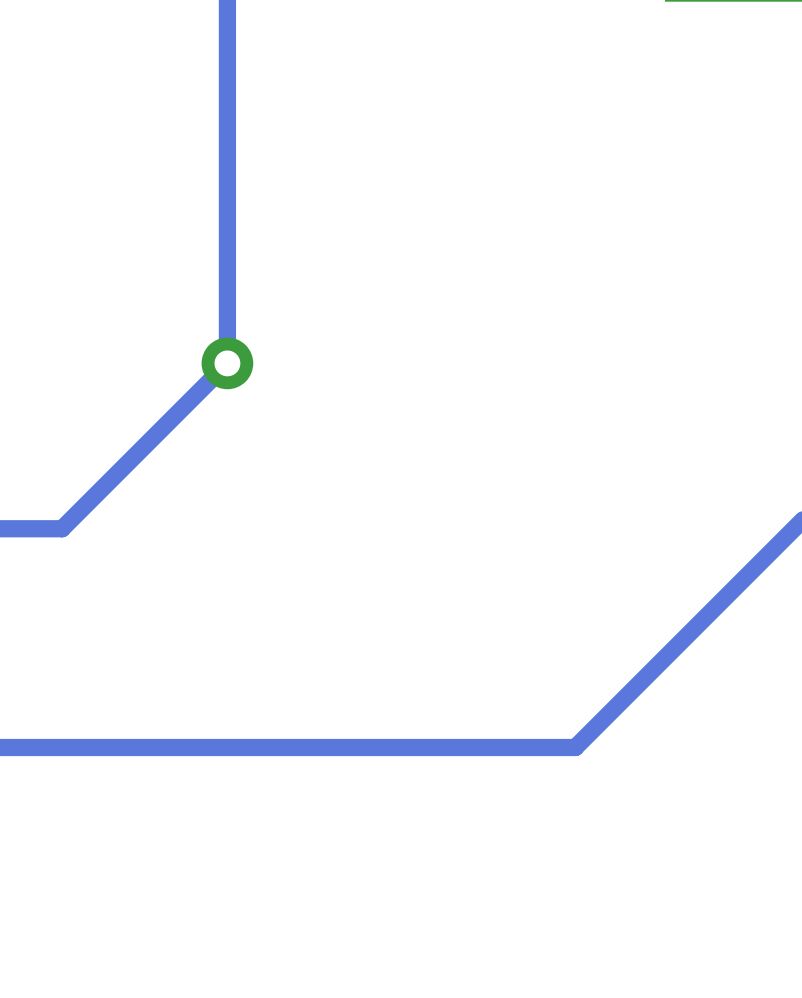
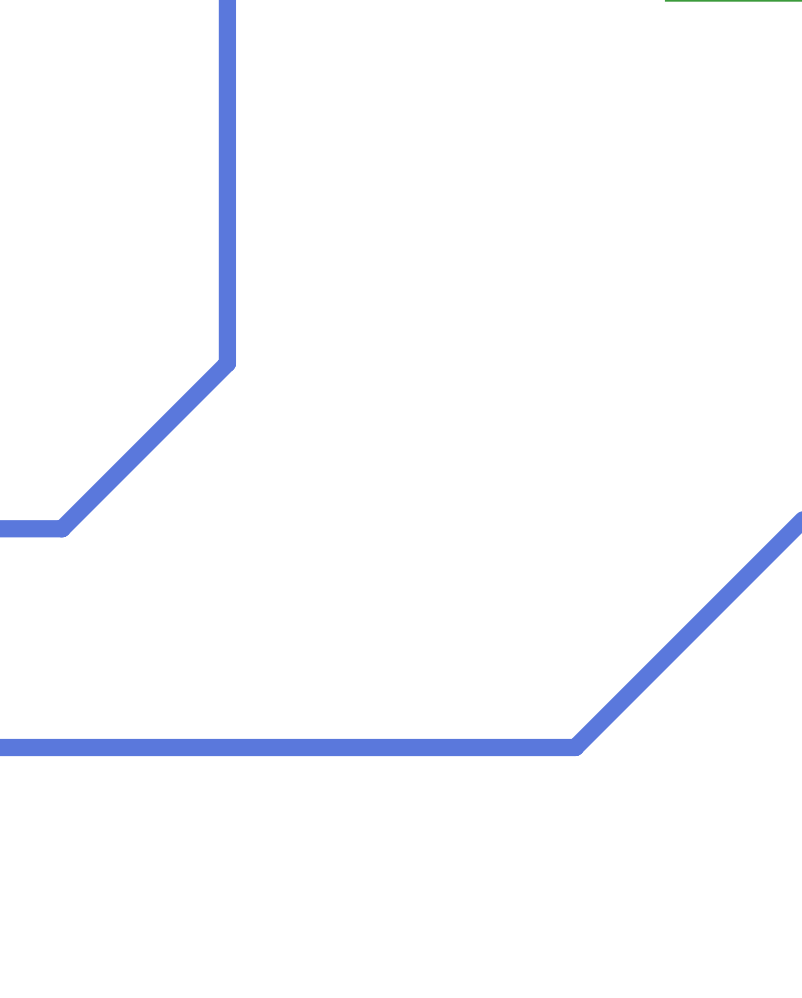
via: (227, 363) -> none

